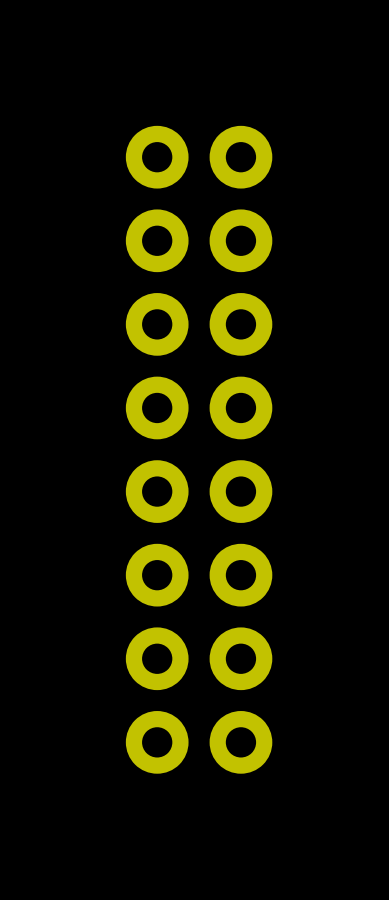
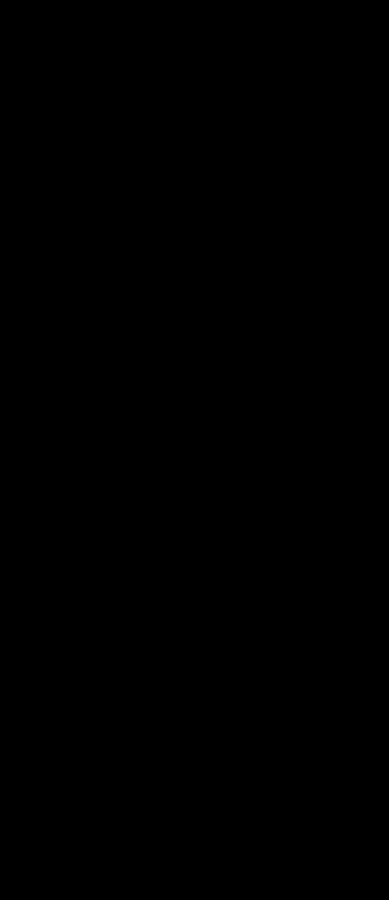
part: (199, 449) -> none

